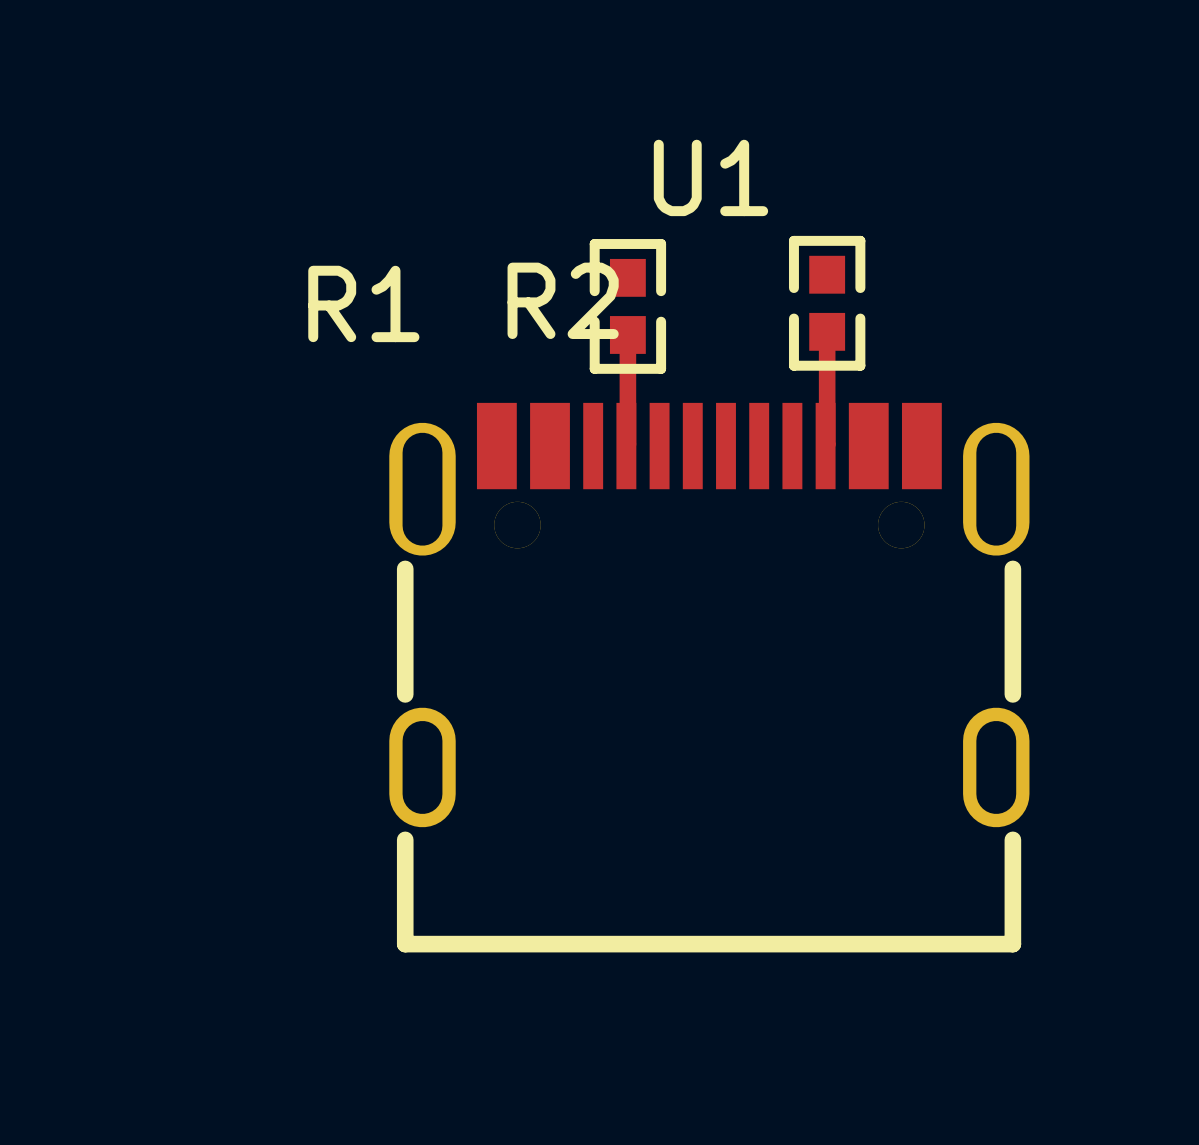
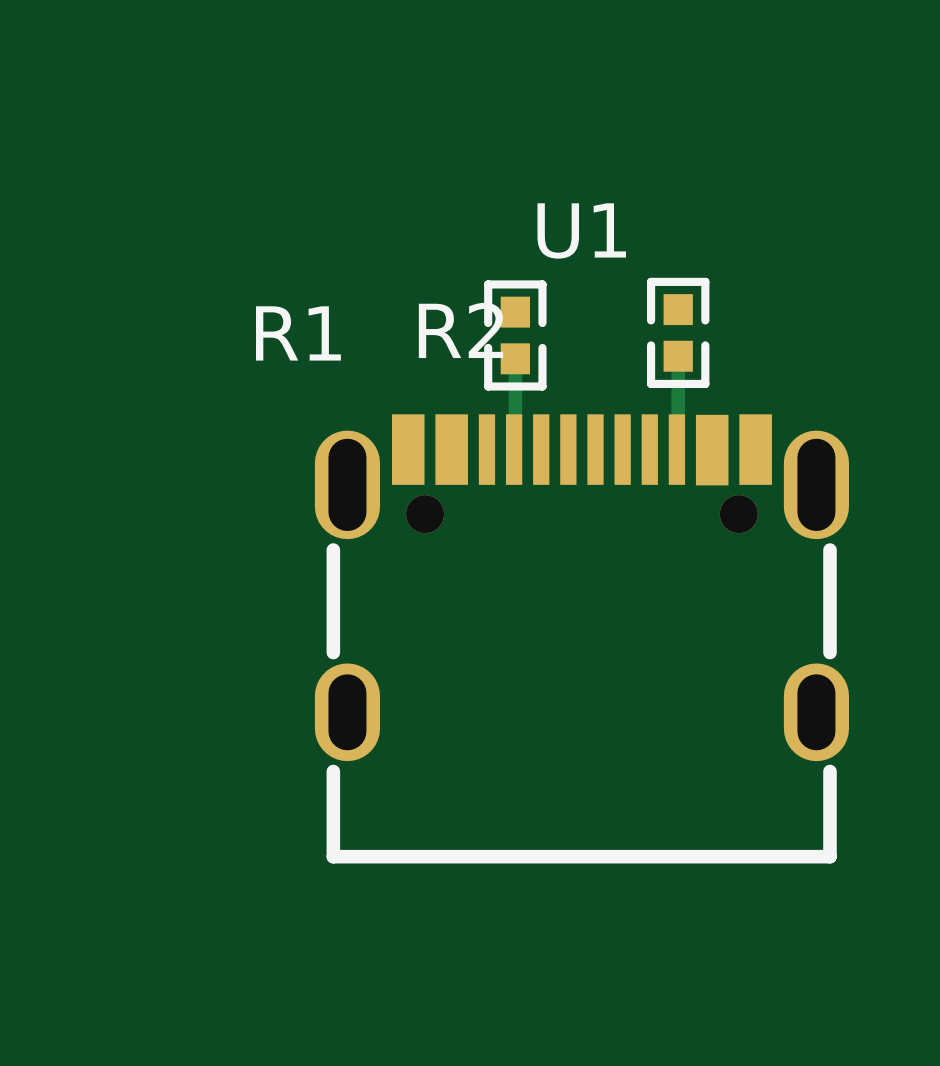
U1 footprint: [389, 402, 1030, 953] -> [314, 414, 849, 864]

